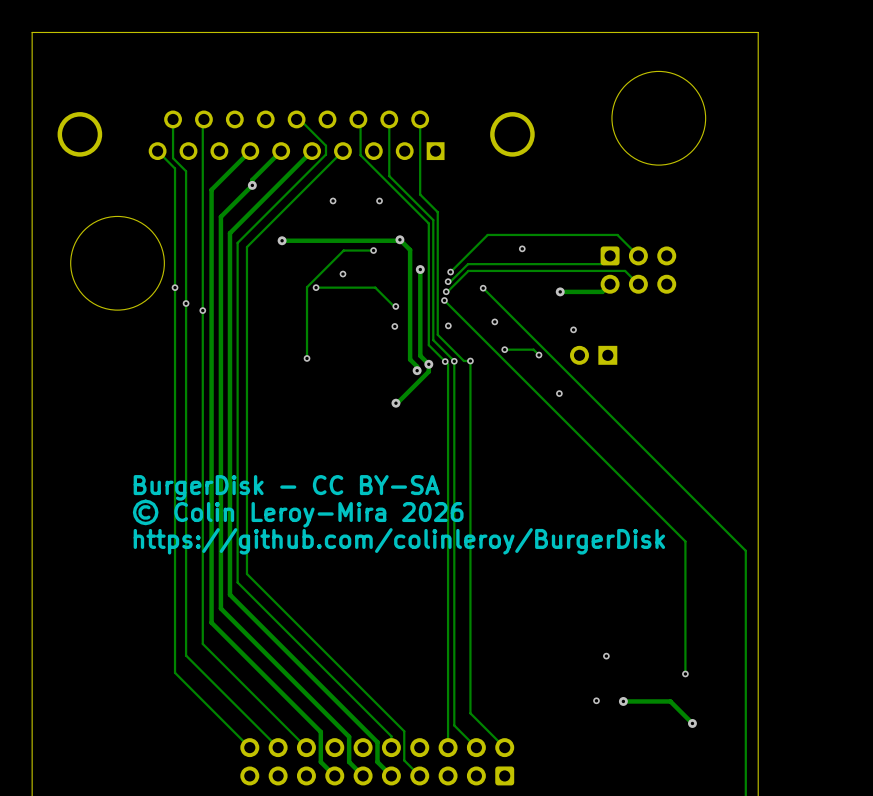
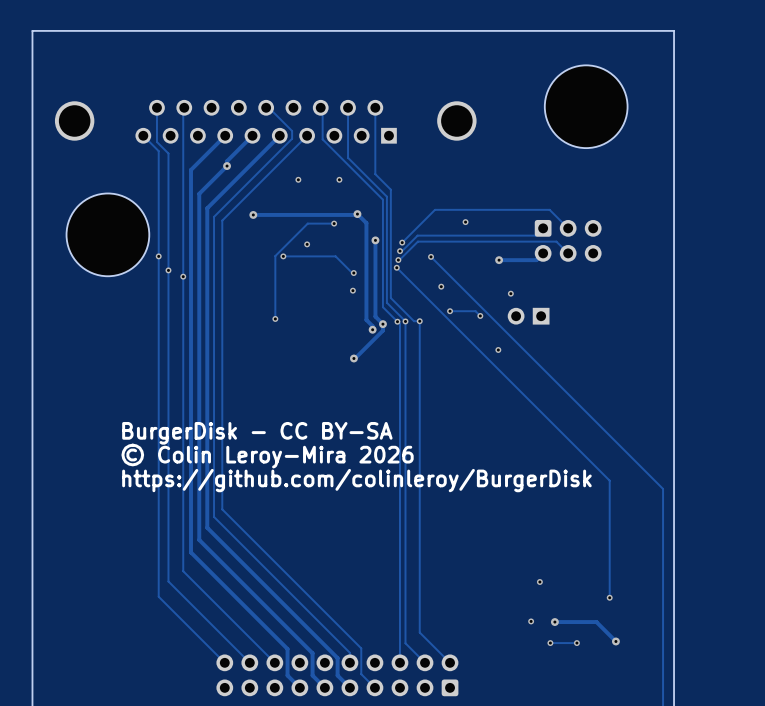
via: (448, 325) -> none
via: none -> (550, 643)
track: none -> (576, 643) (550, 643)
via: none -> (576, 643)

